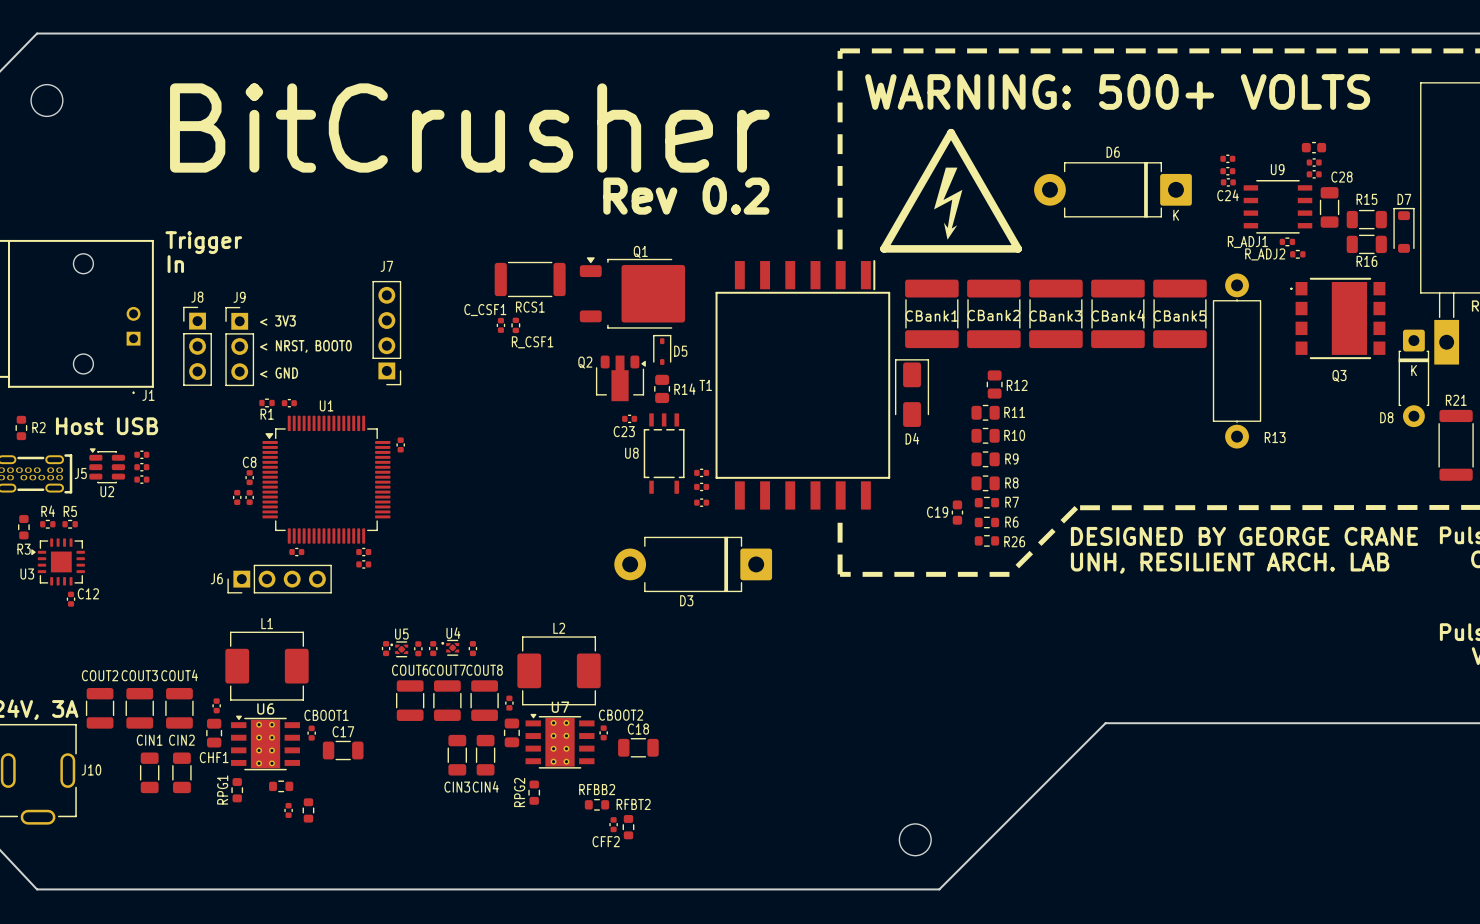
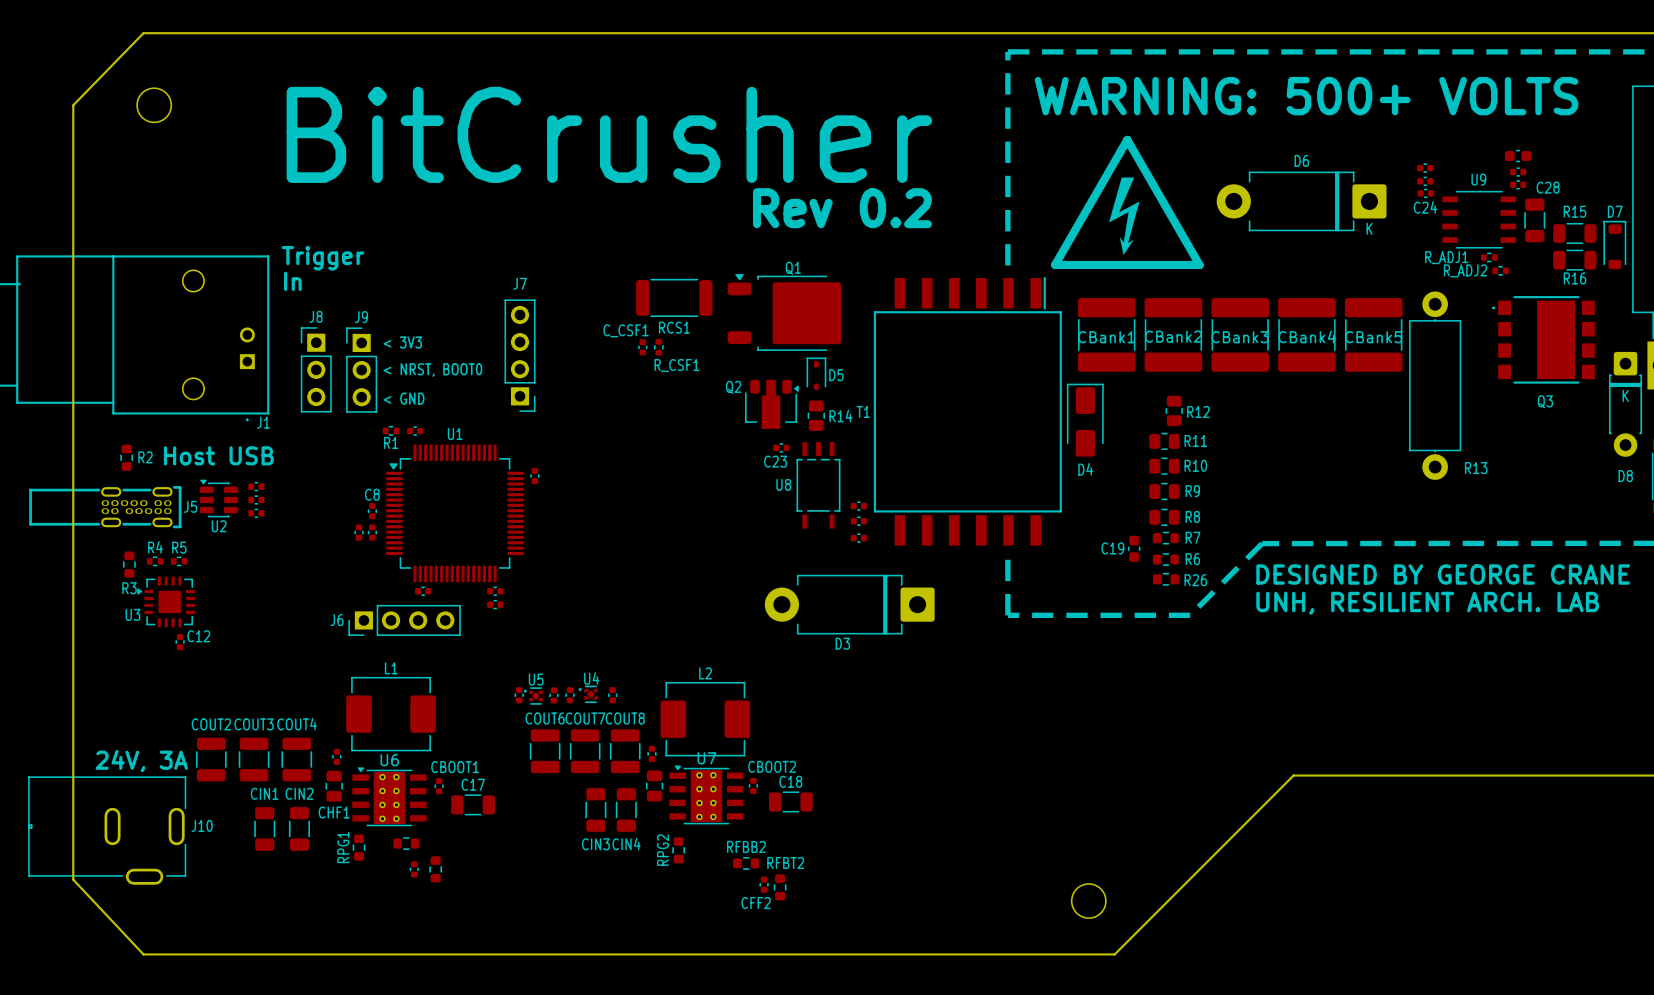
D8 name position: D8 (1386, 417) -> D8 (1625, 476)

